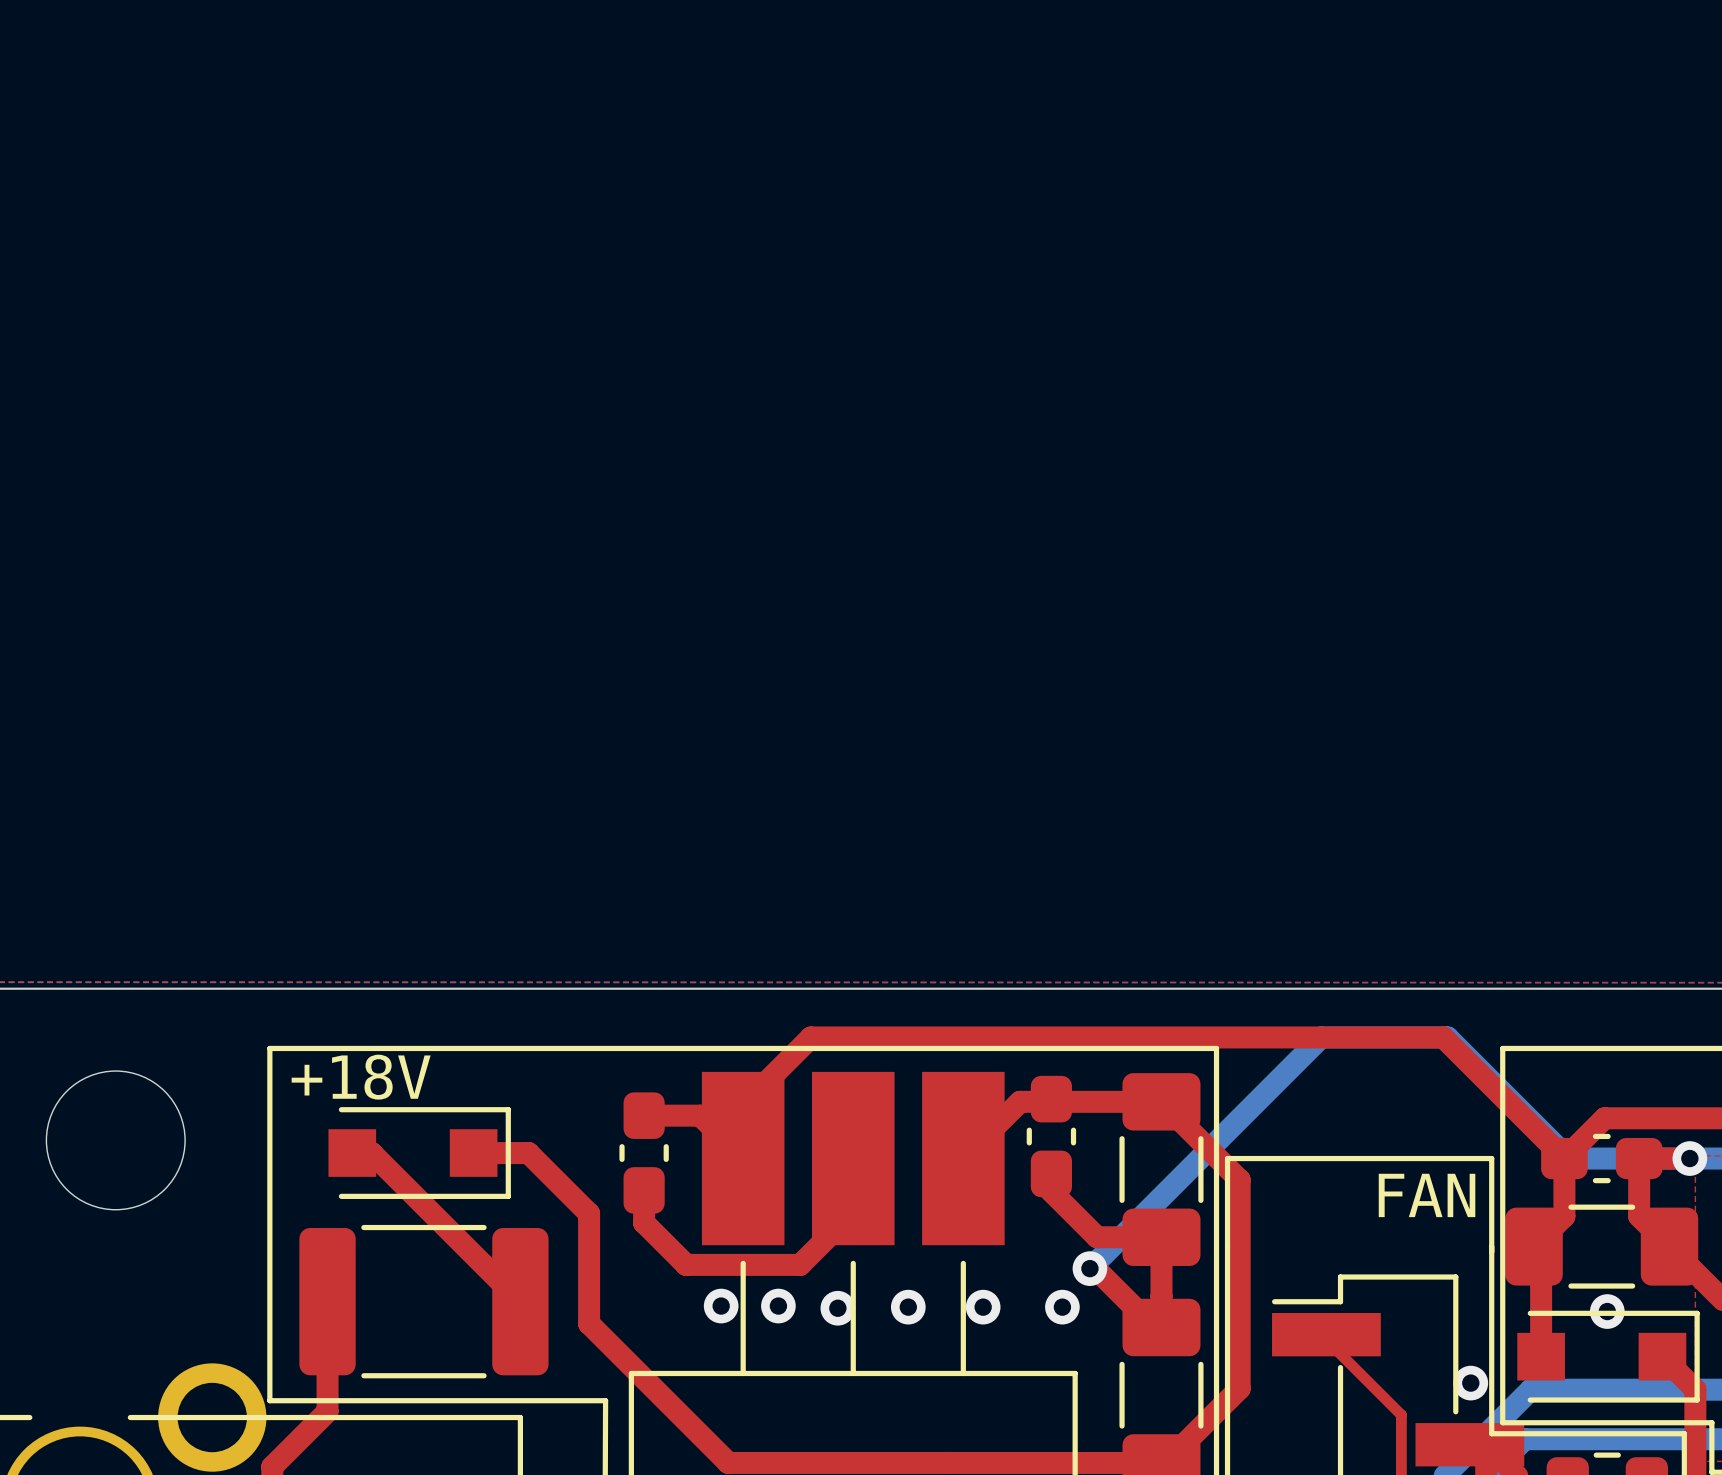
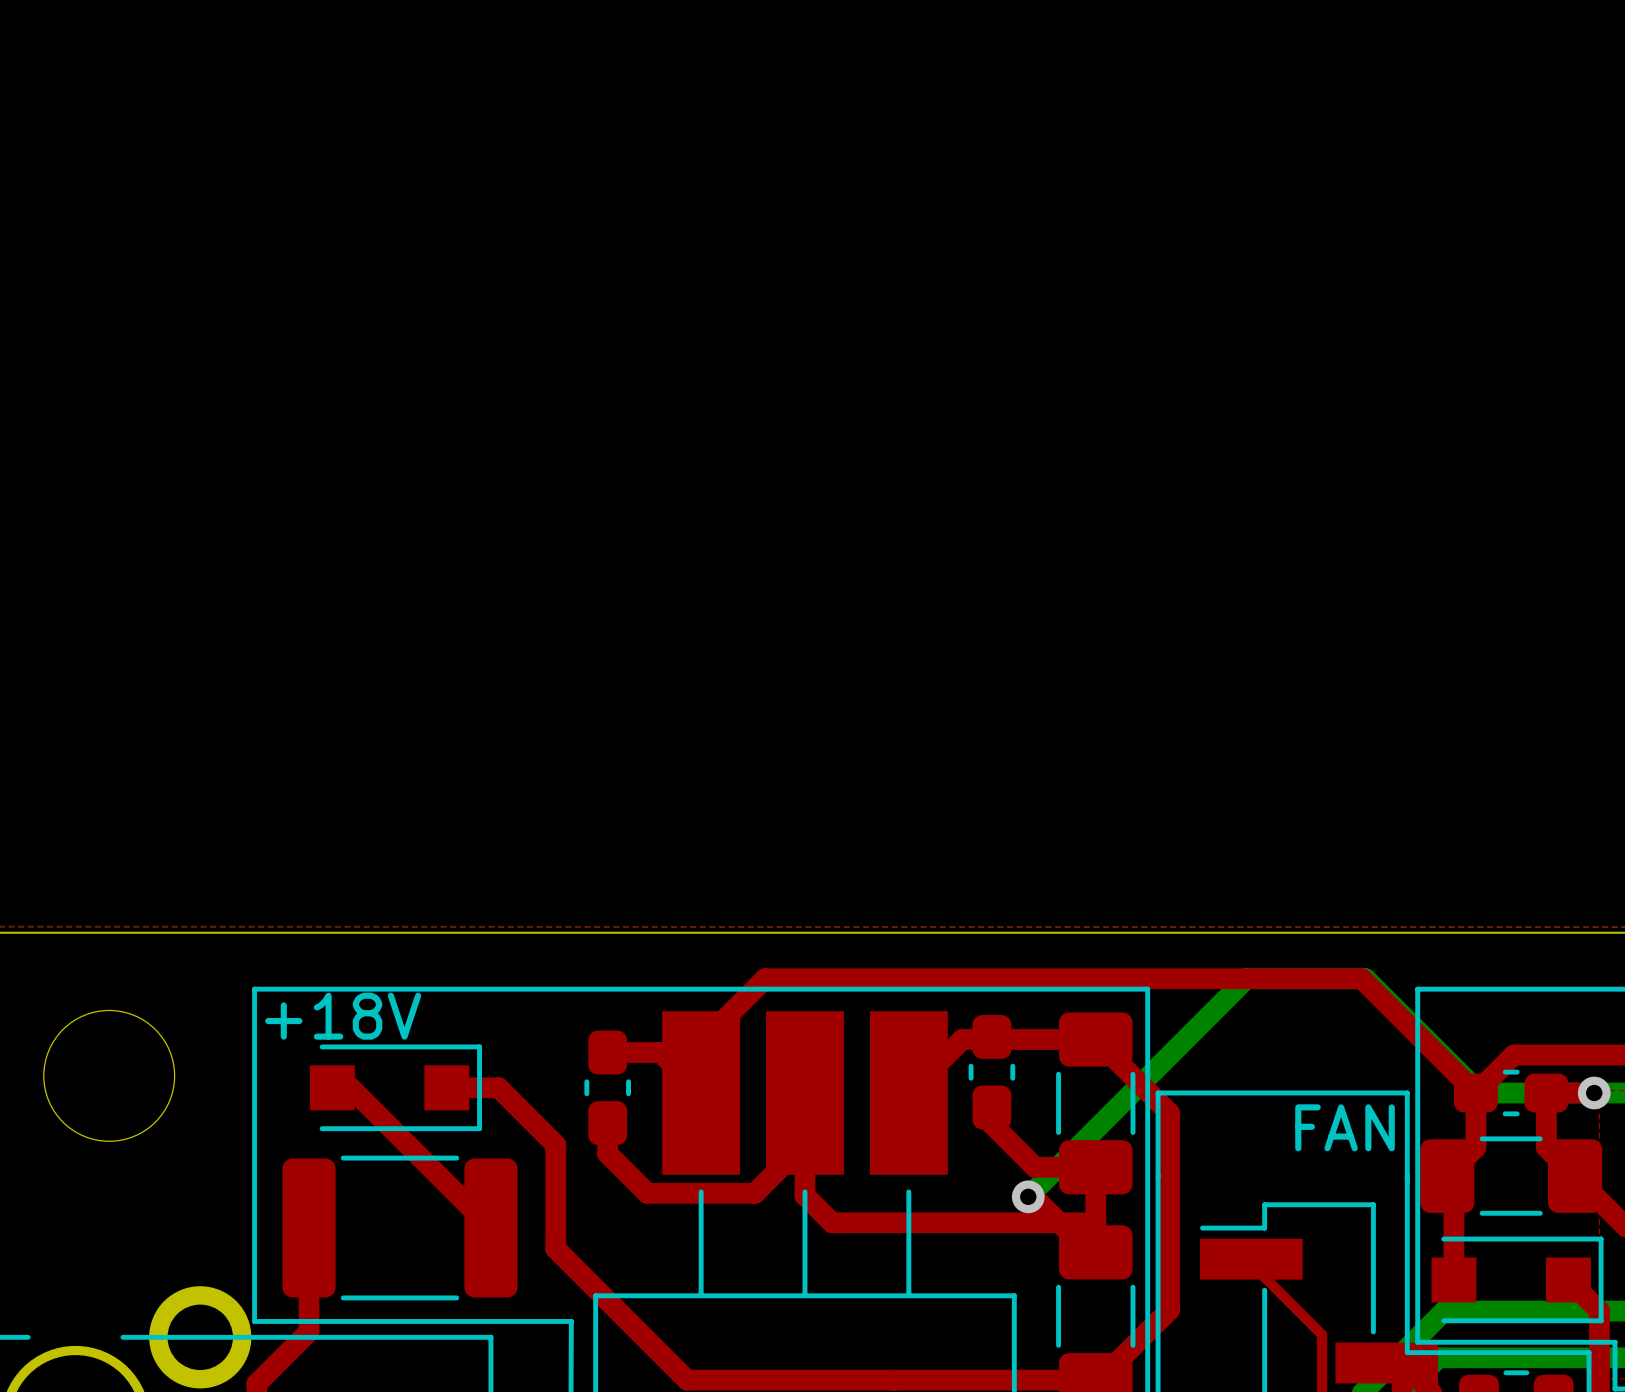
top track: none -> (804, 1143) (804, 1195) (832, 1222) (1095, 1222)
via: (721, 1306) -> none
via: (778, 1306) -> none
via: (908, 1307) -> none
via: (983, 1307) -> none
via: (1062, 1307) -> none
via: (837, 1308) -> none
via: (1607, 1311) -> none
via: (1470, 1383) -> none

